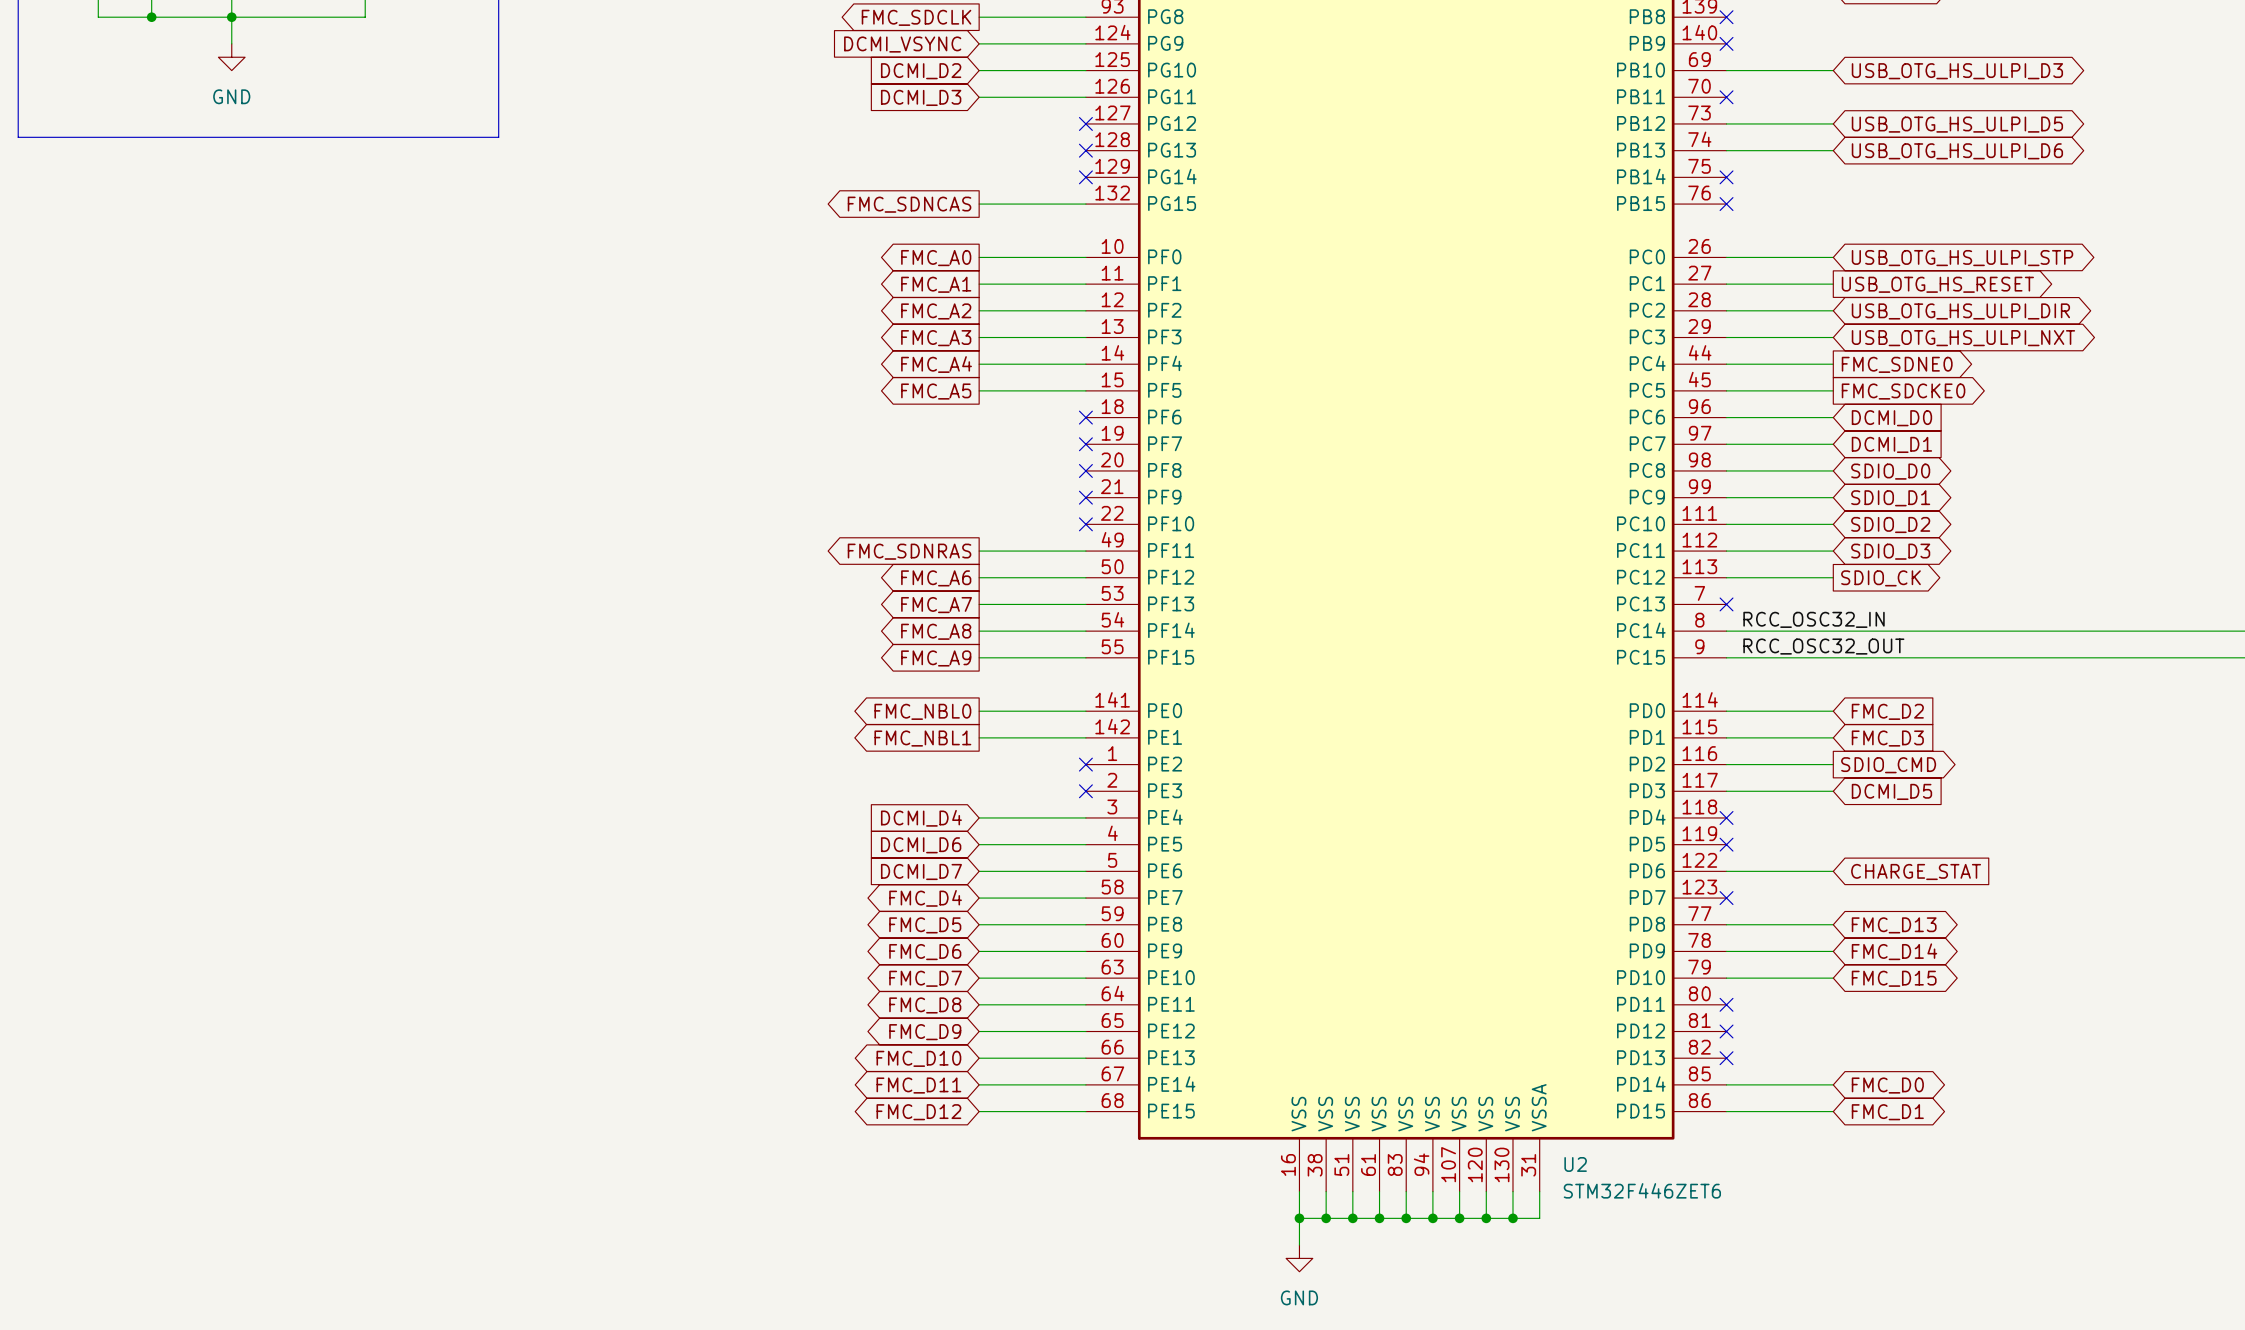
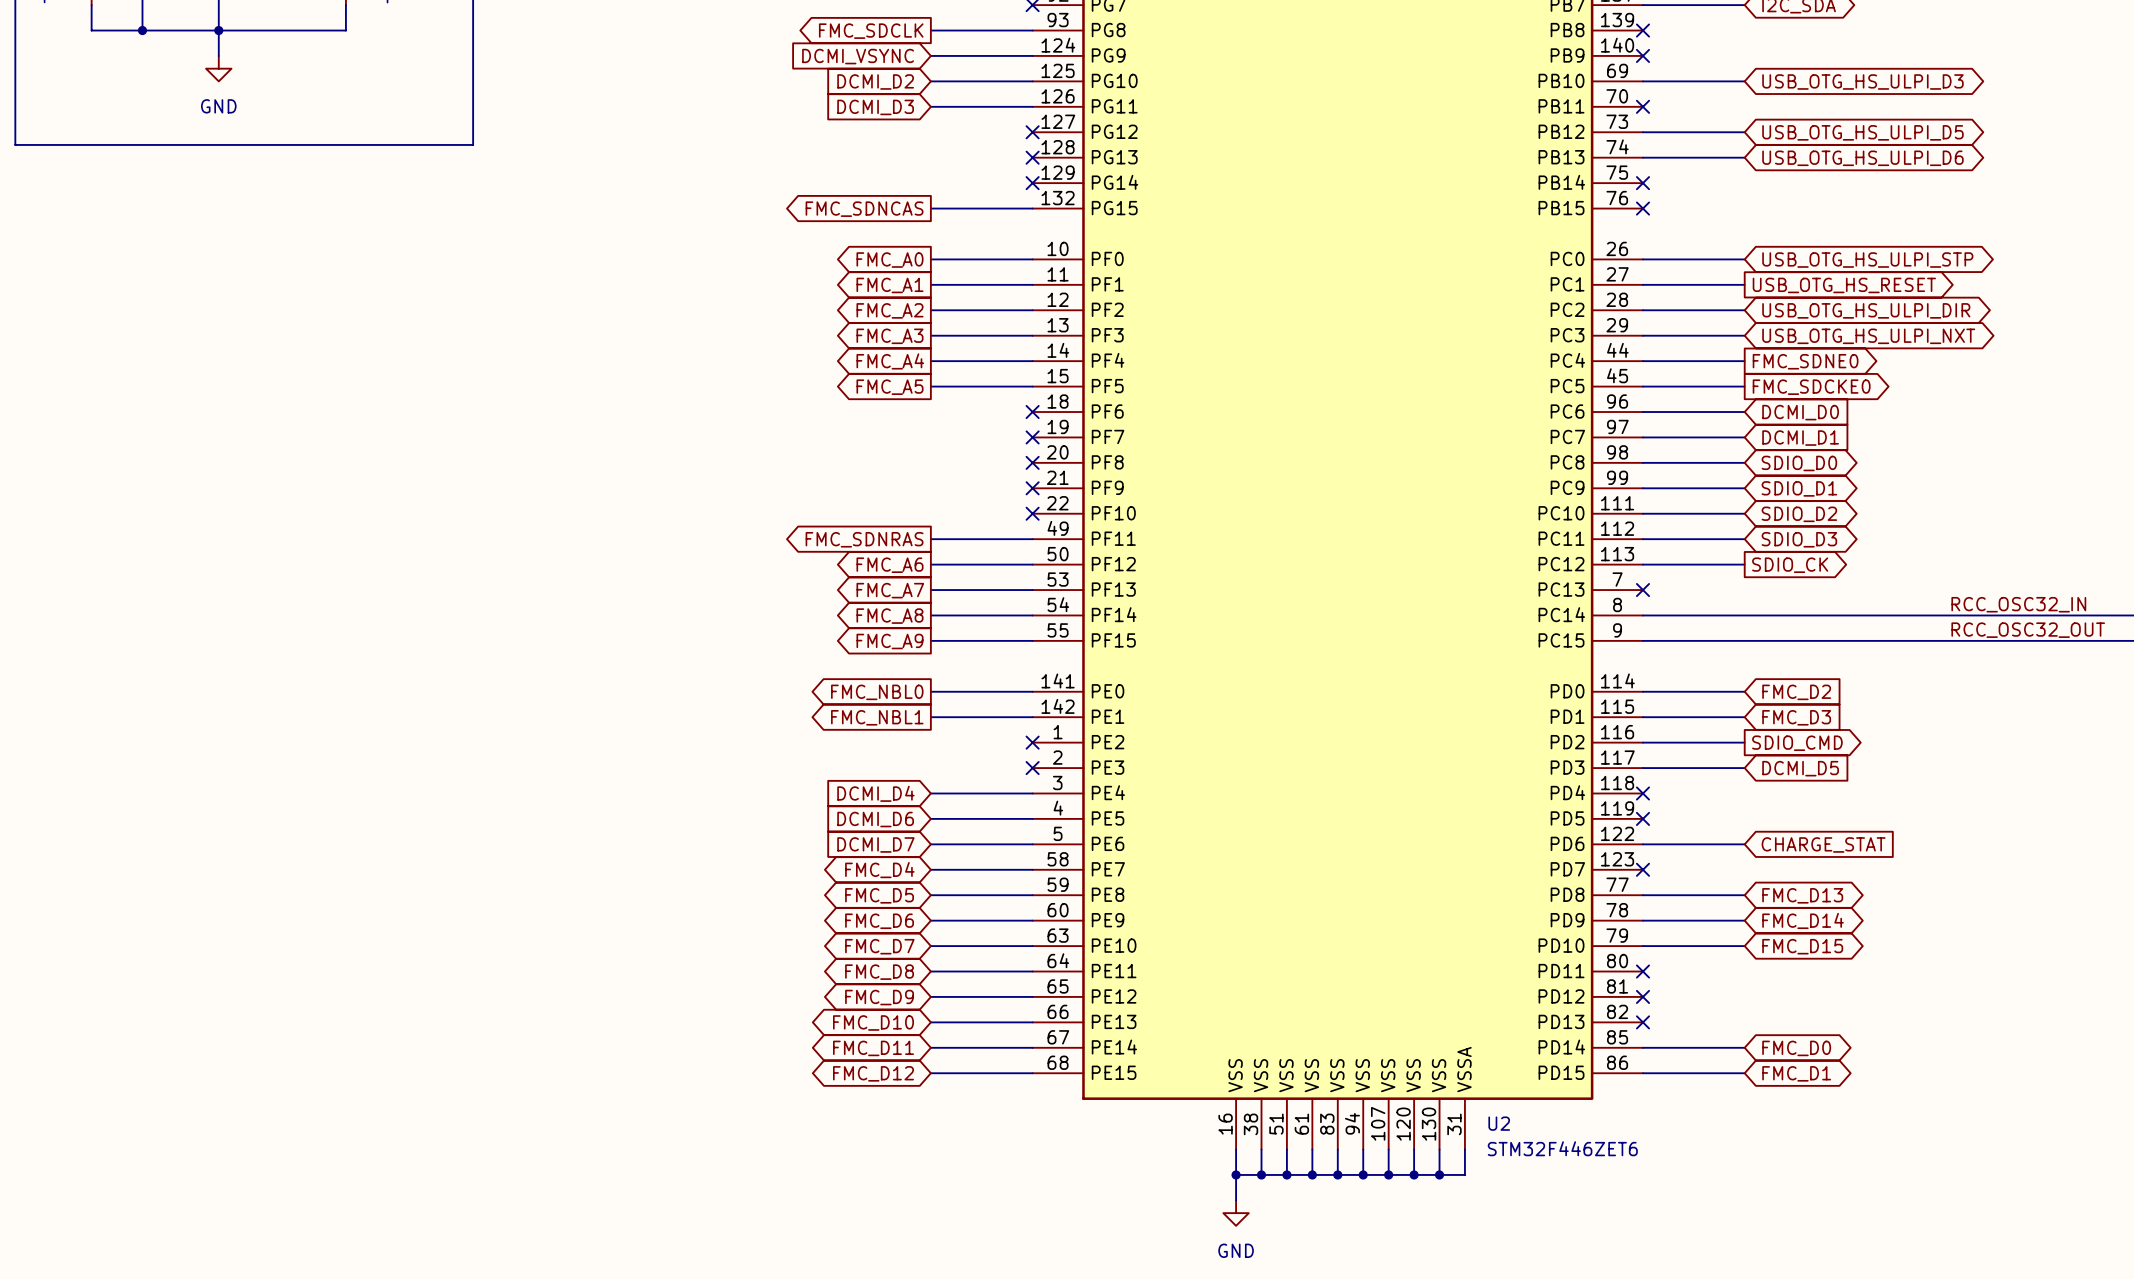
label: RCC_OSC32_IN (1814, 619) -> none
label: none -> RCC_OSC32_IN (2018, 604)
label: RCC_OSC32_OUT (1823, 646) -> none
label: none -> RCC_OSC32_OUT (2028, 630)

